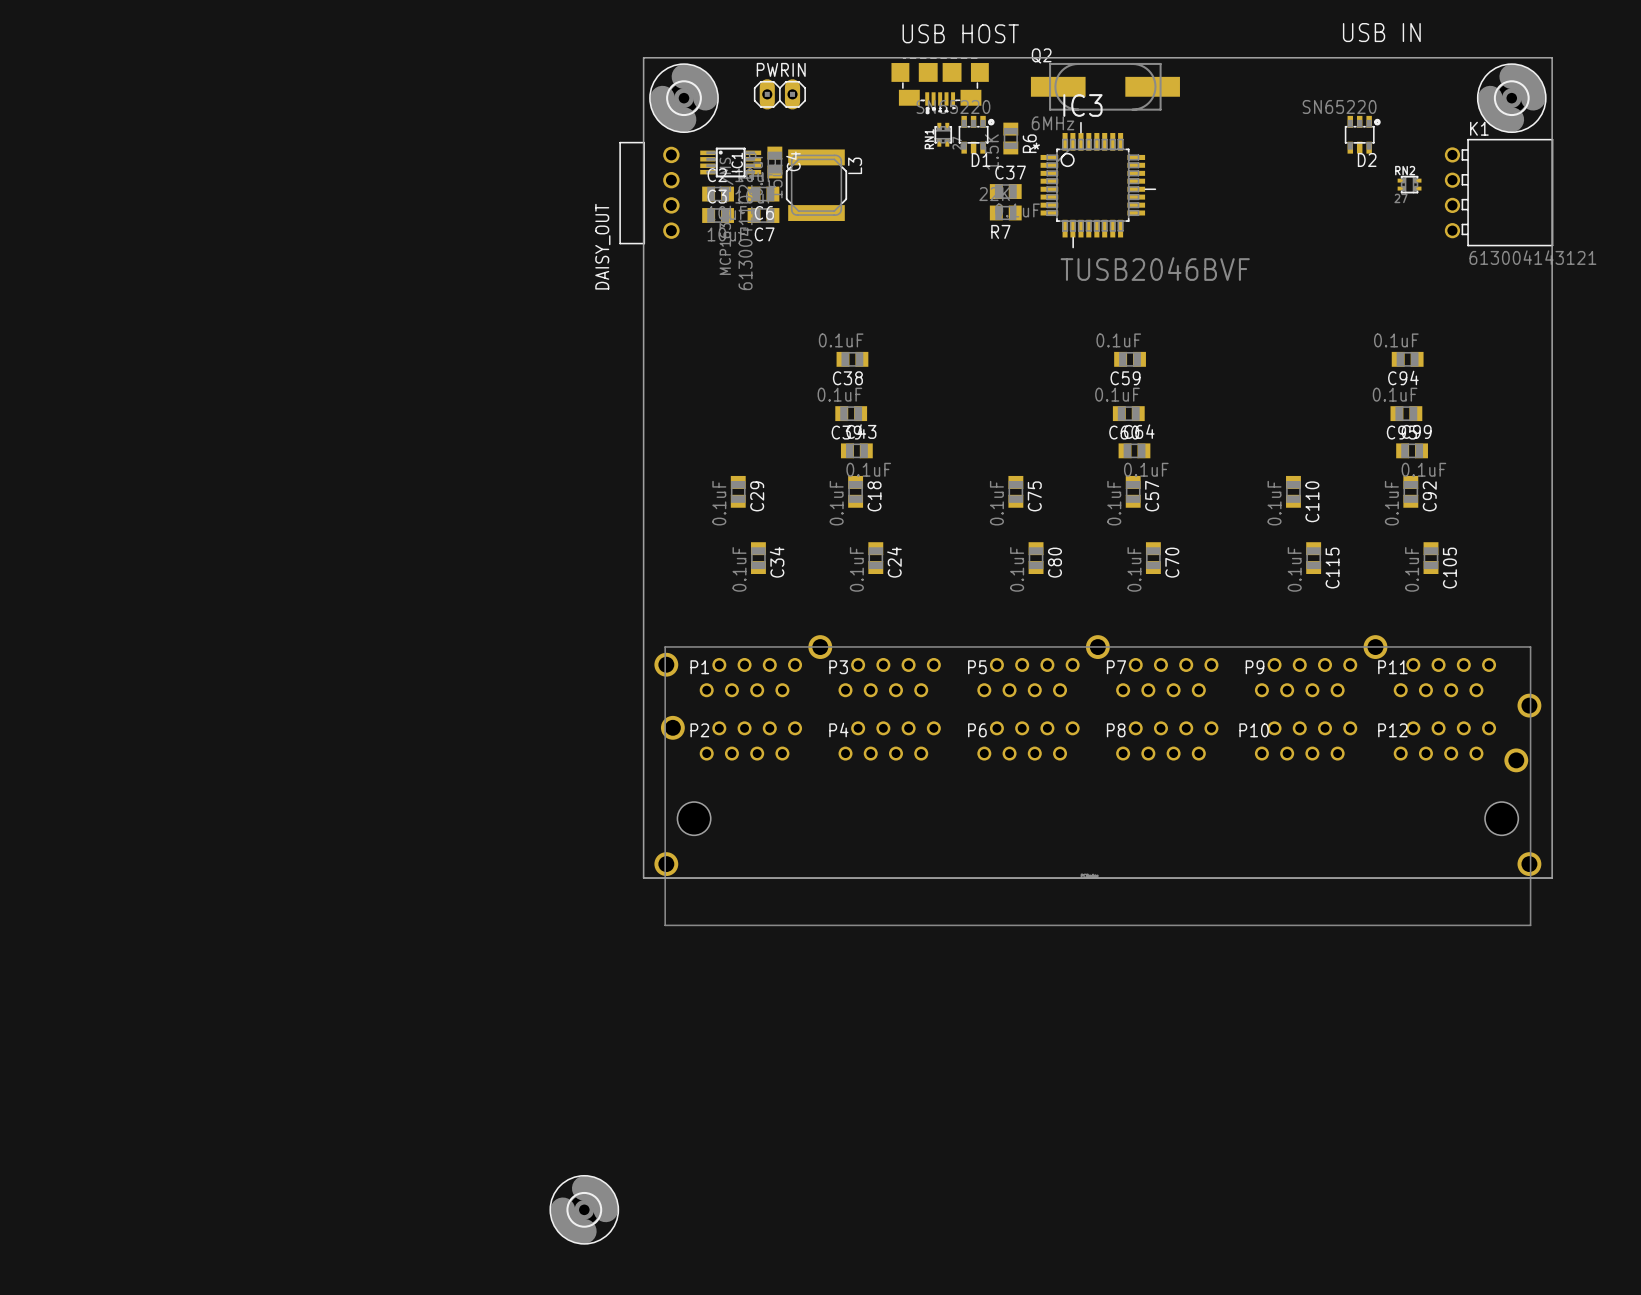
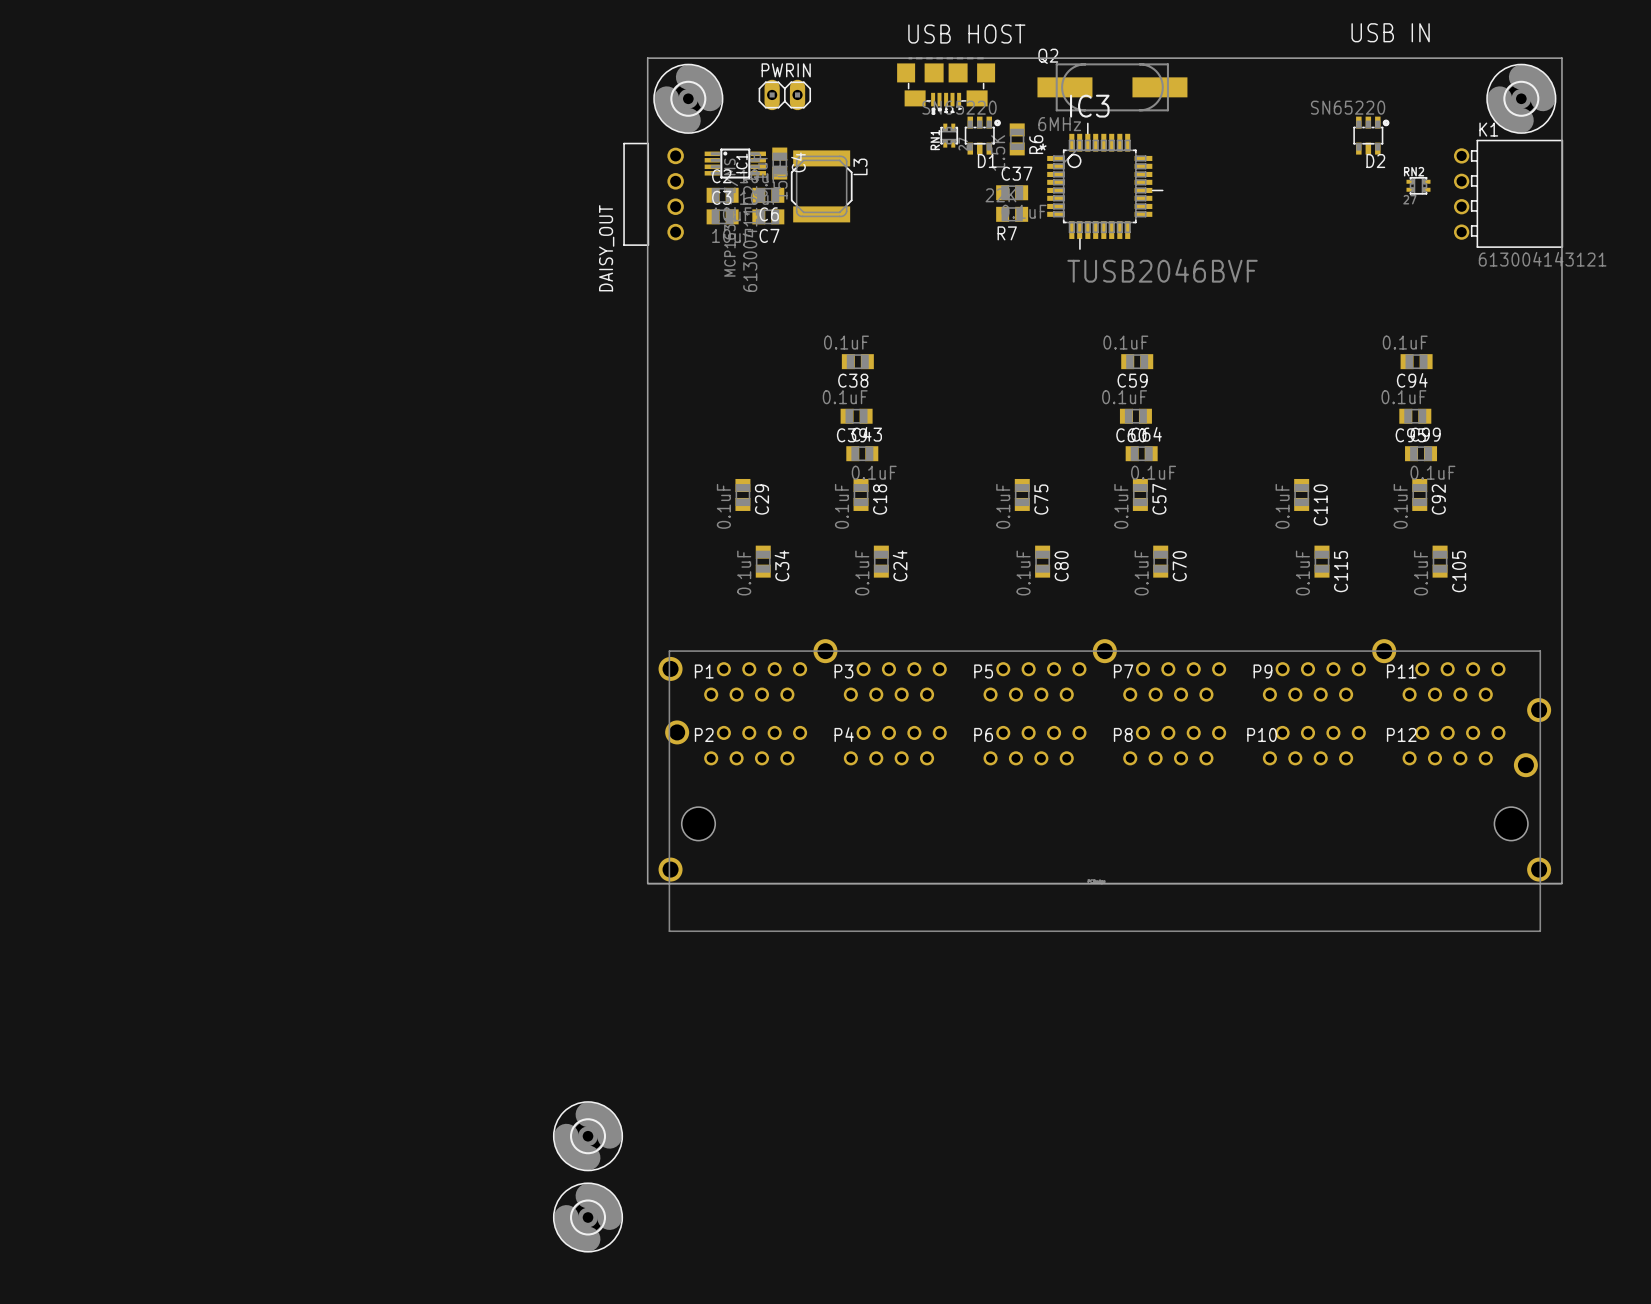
part: none -> (588, 1136)

